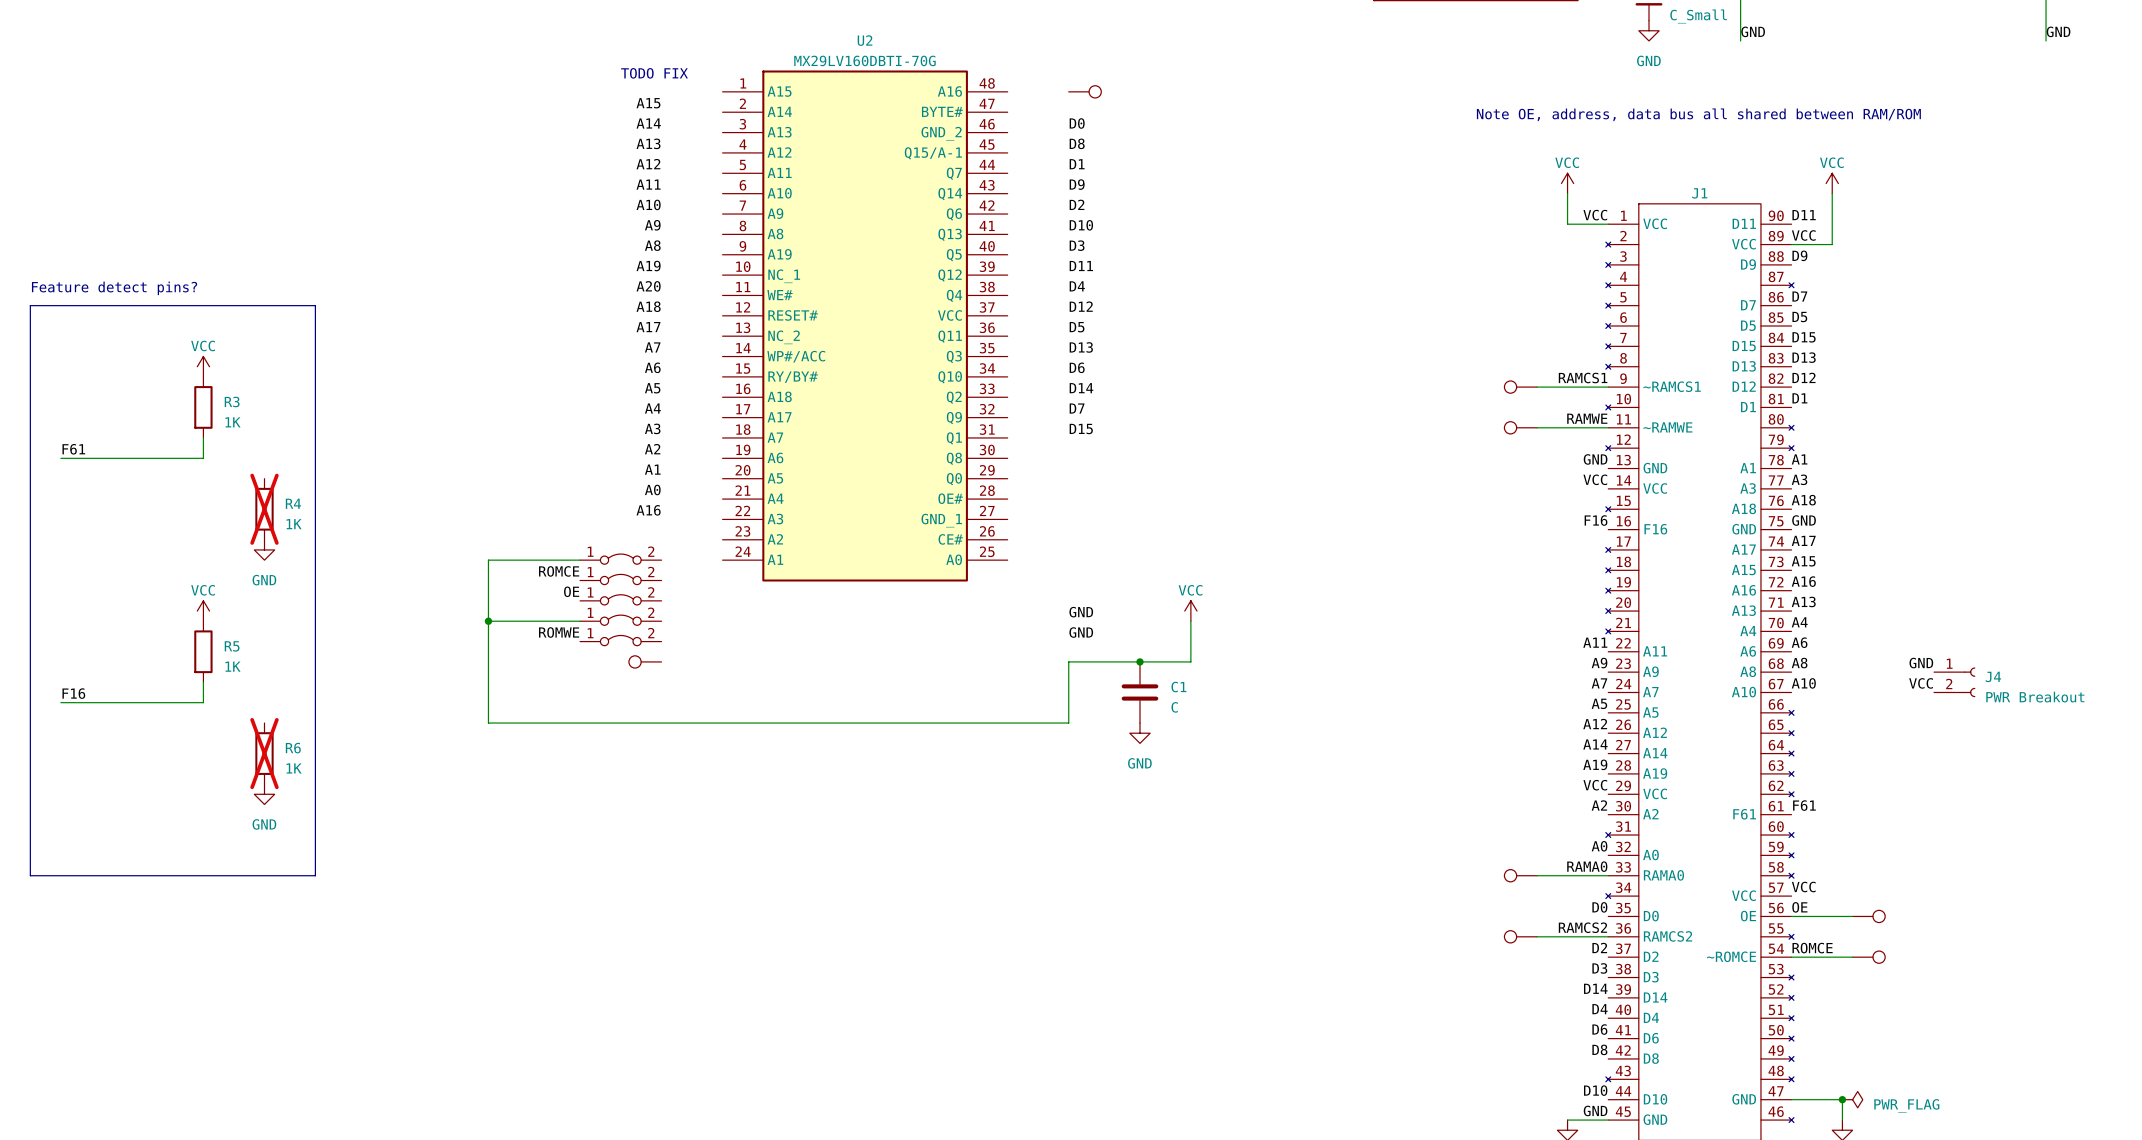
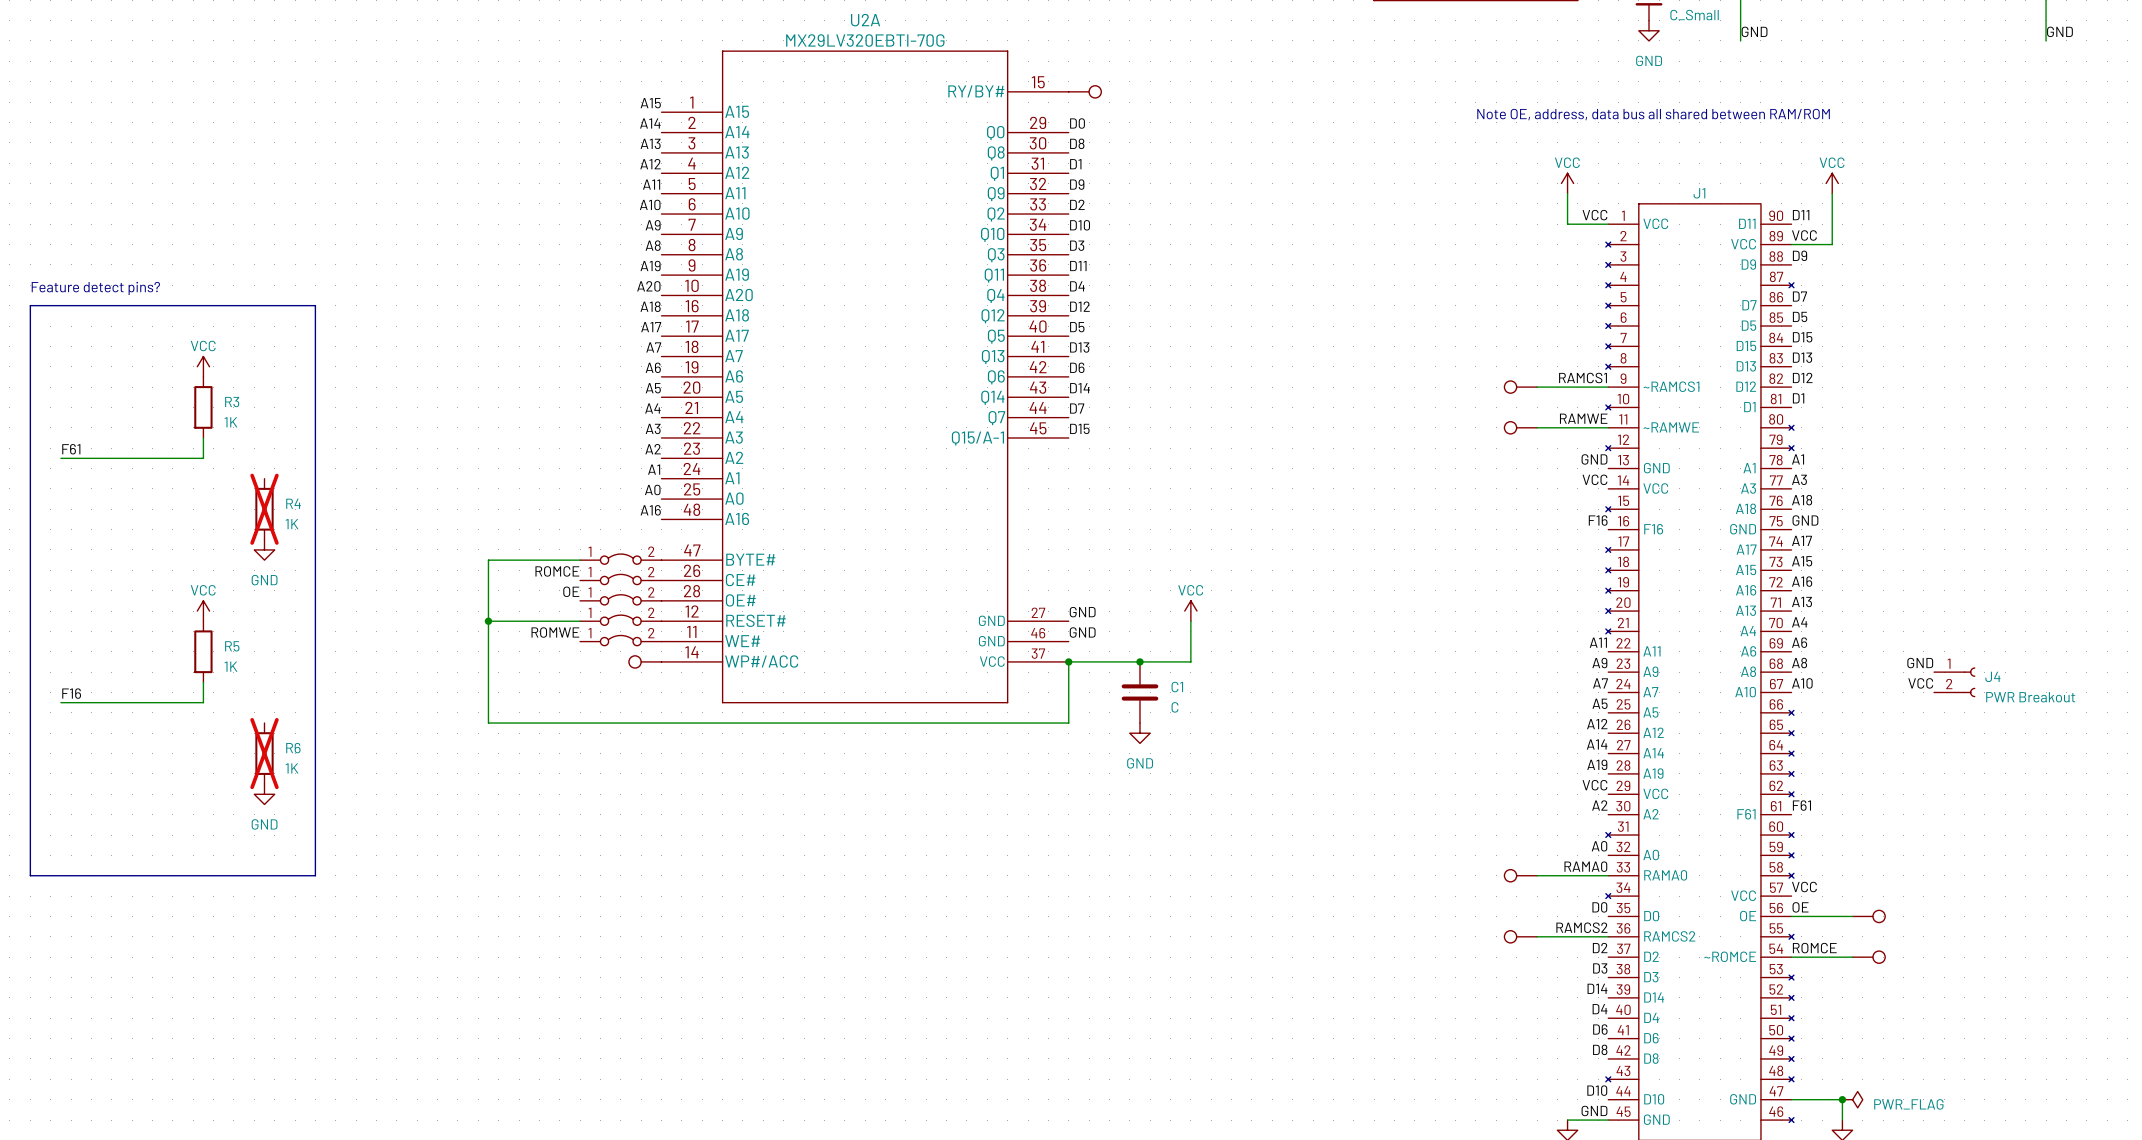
text: TODO FIX (654, 73) -> none
U2: MX29LV160DBTI-70G (865, 326) -> none
U2A: none -> MX29LV320EBTI-70G (865, 376)
junction: none -> (1068, 661)

